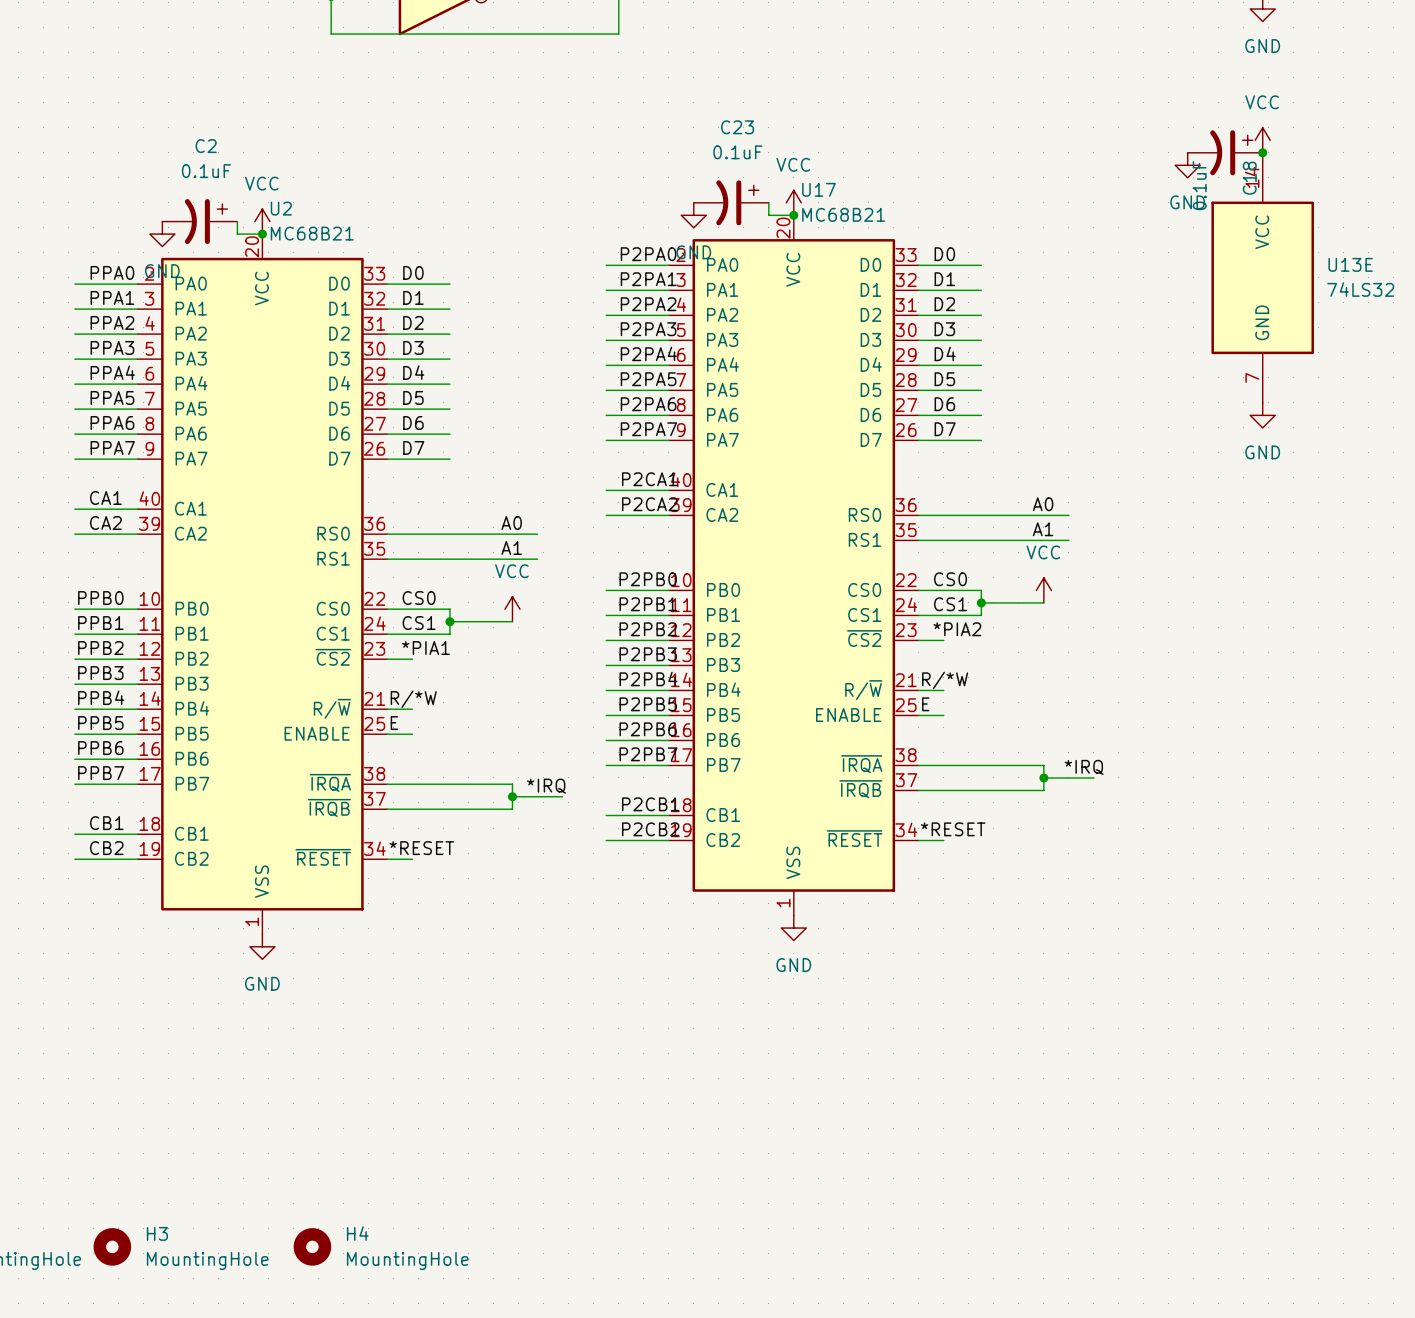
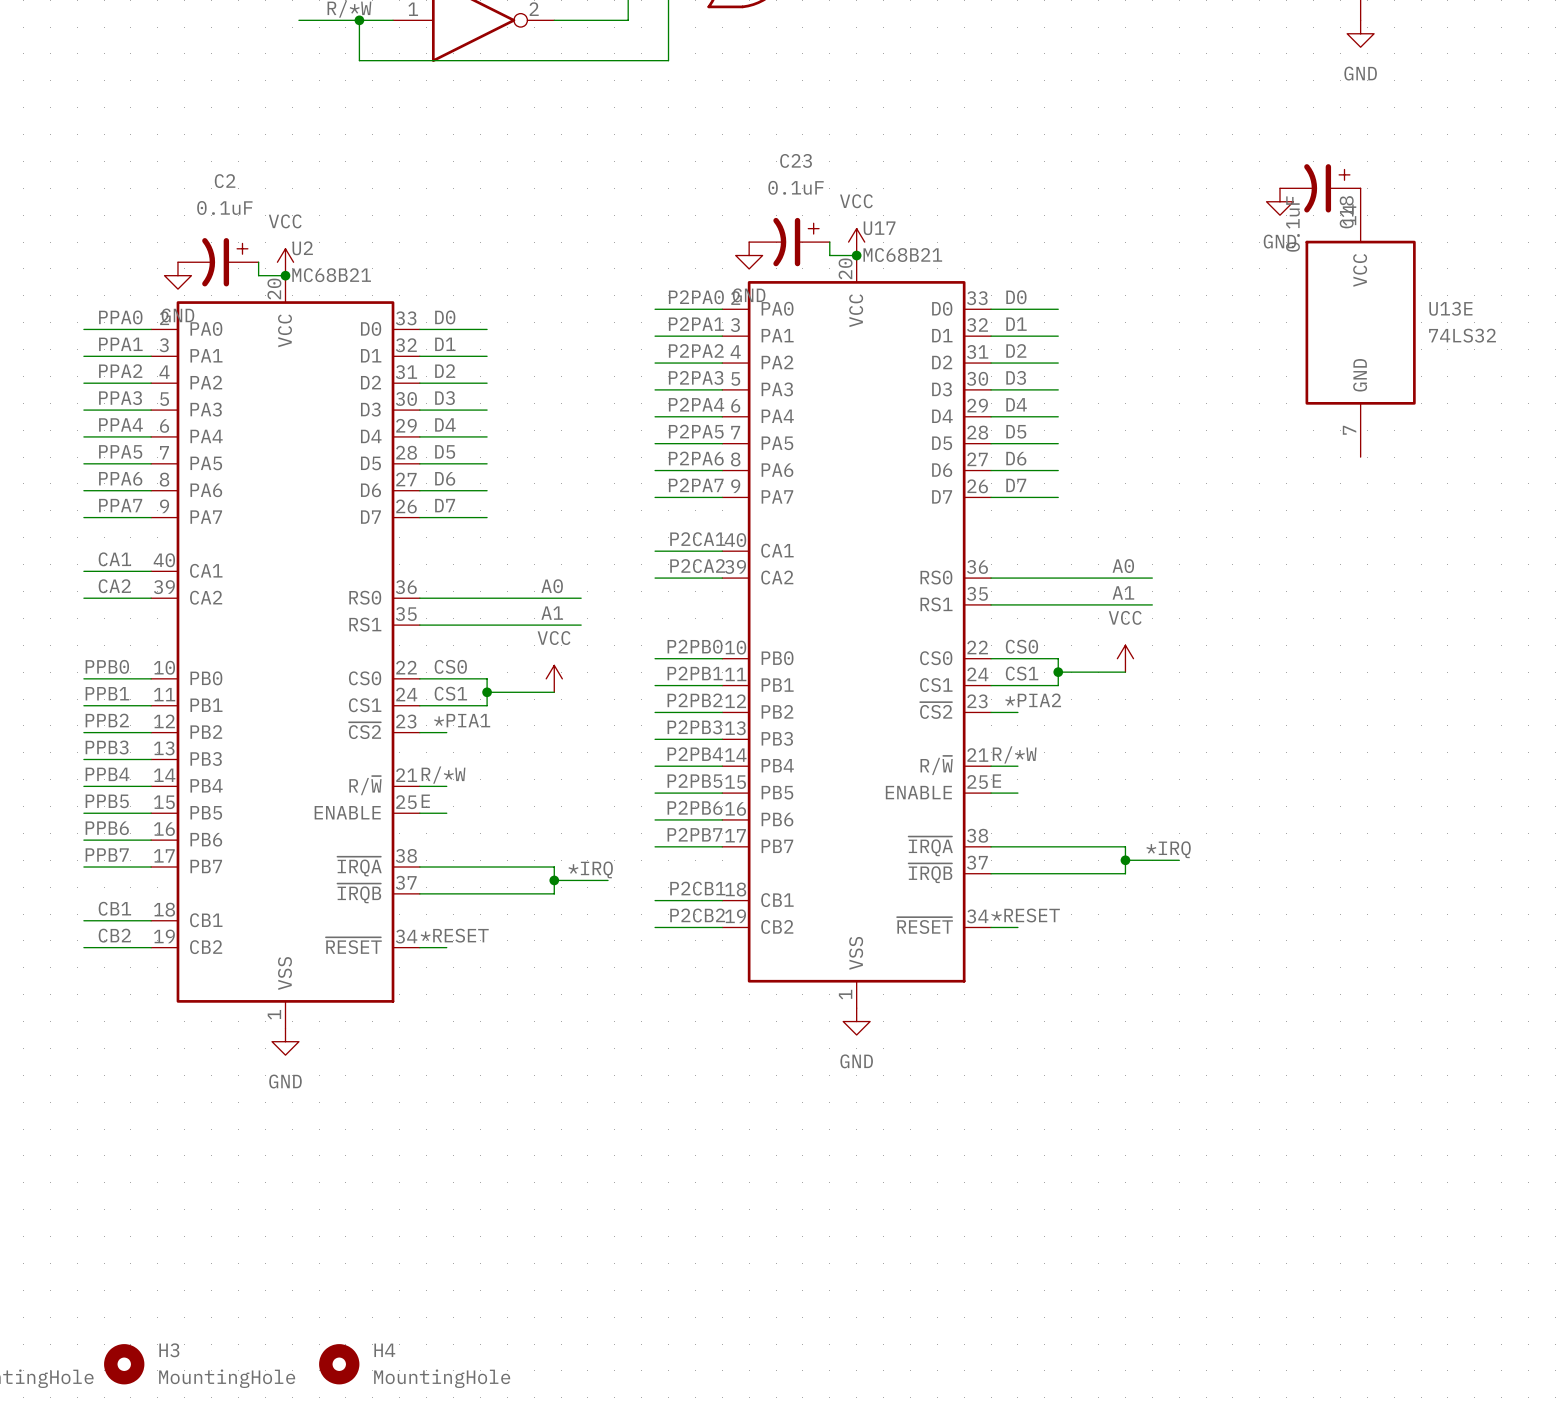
power symbol: VCC (1262, 140) -> none
junction: (1262, 152) -> none
power symbol: GND (1262, 415) -> none

